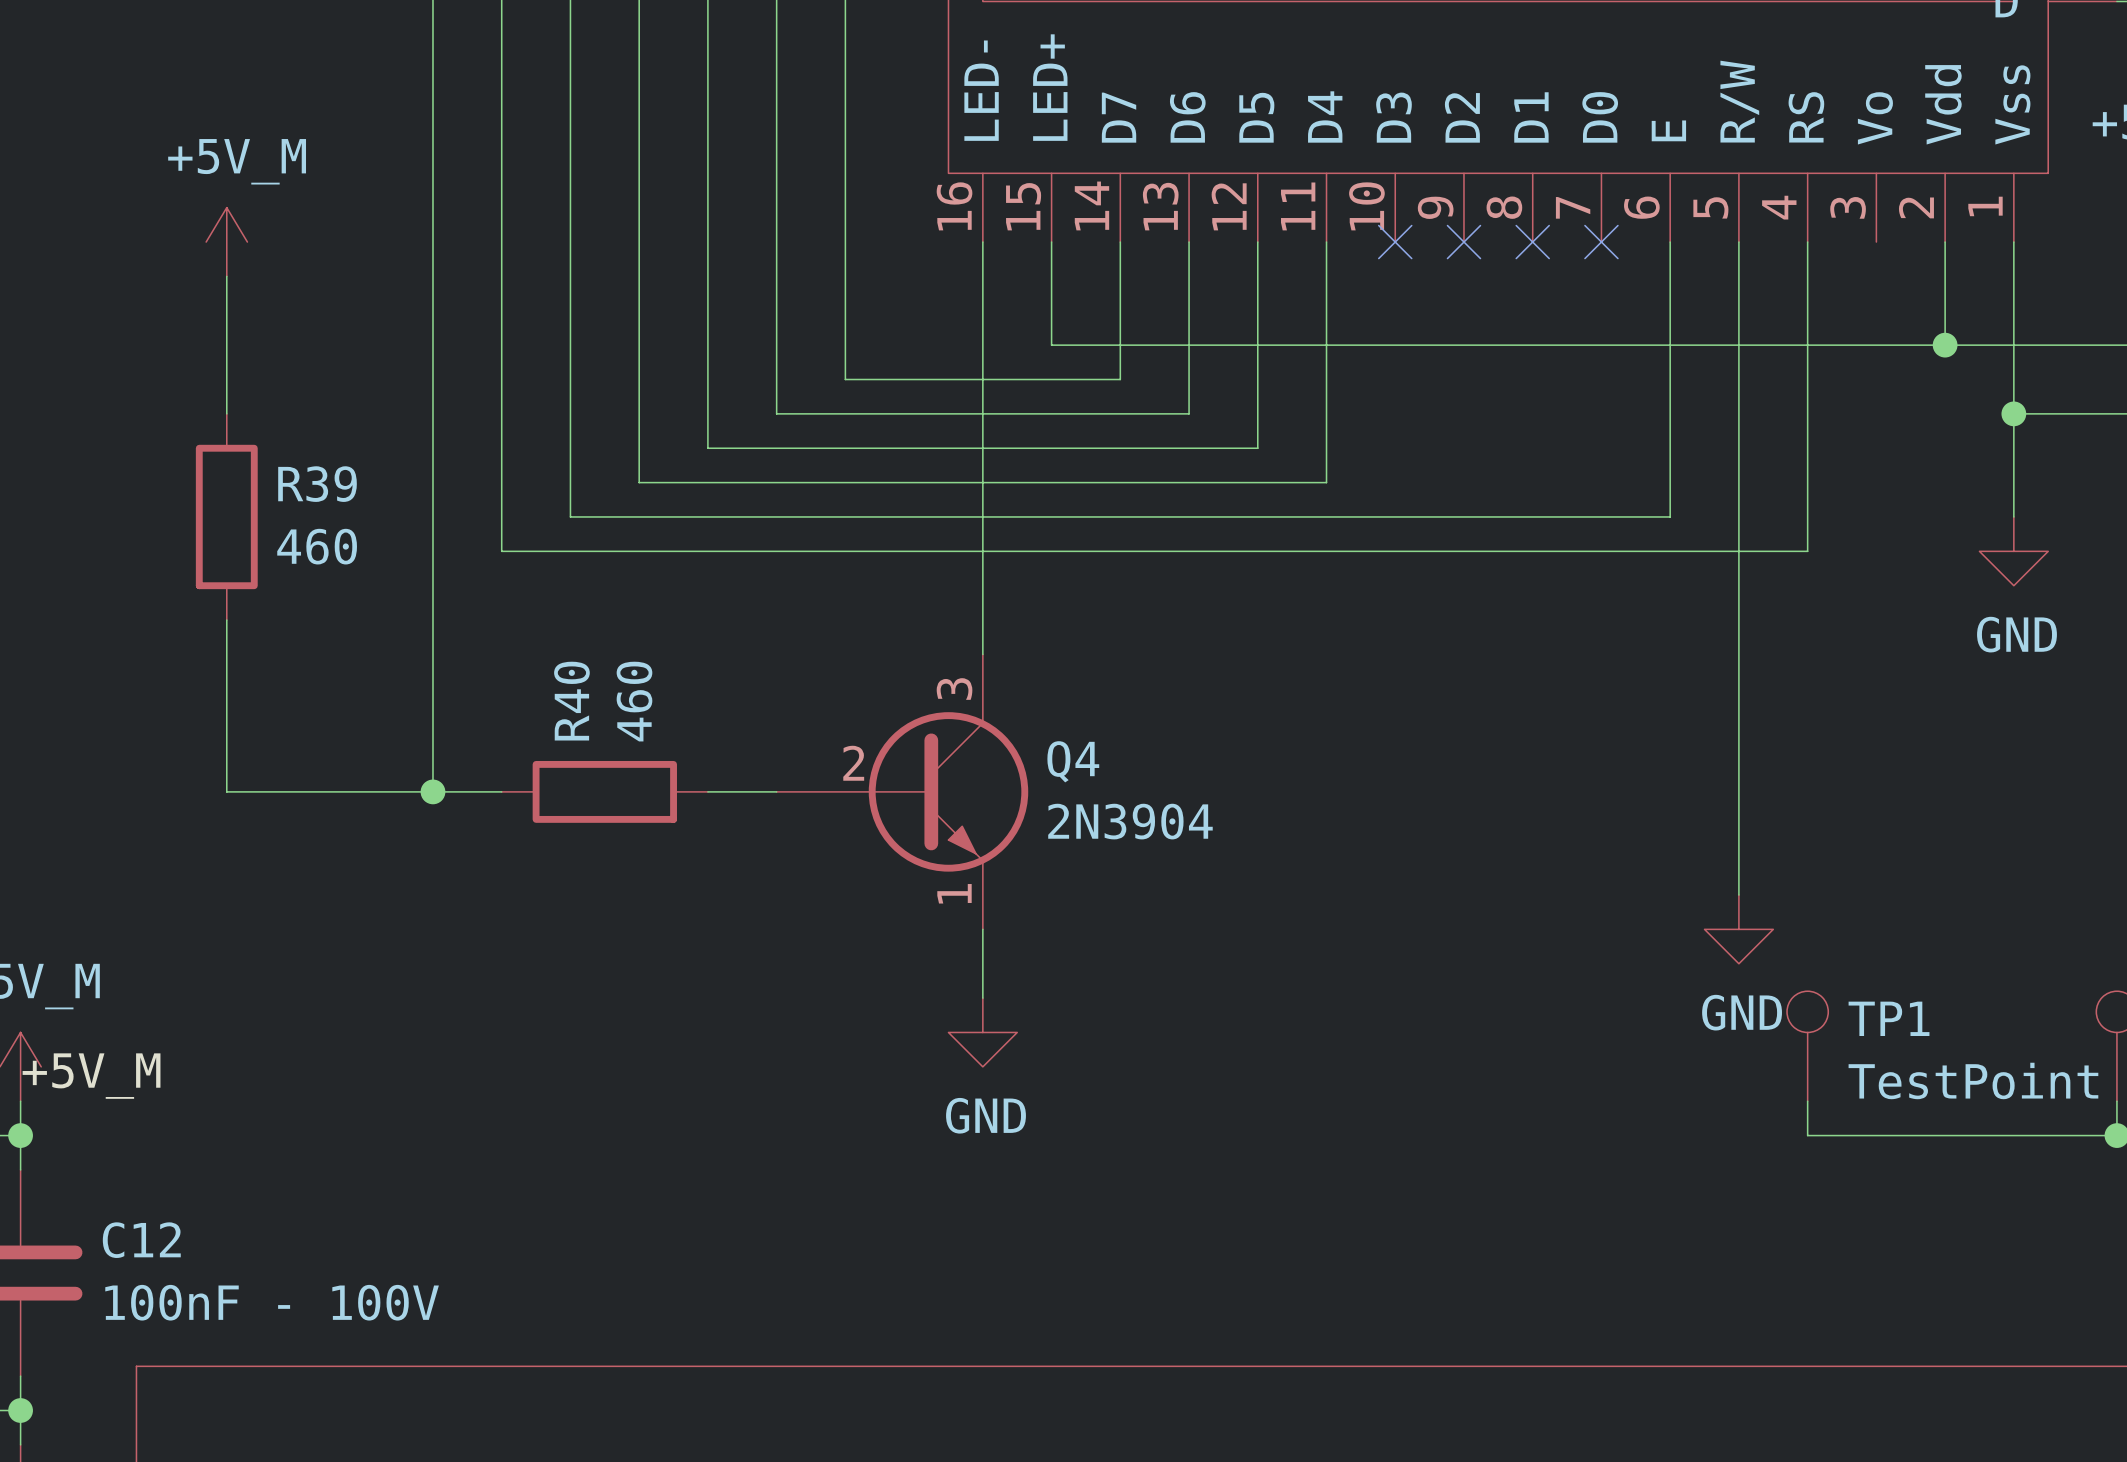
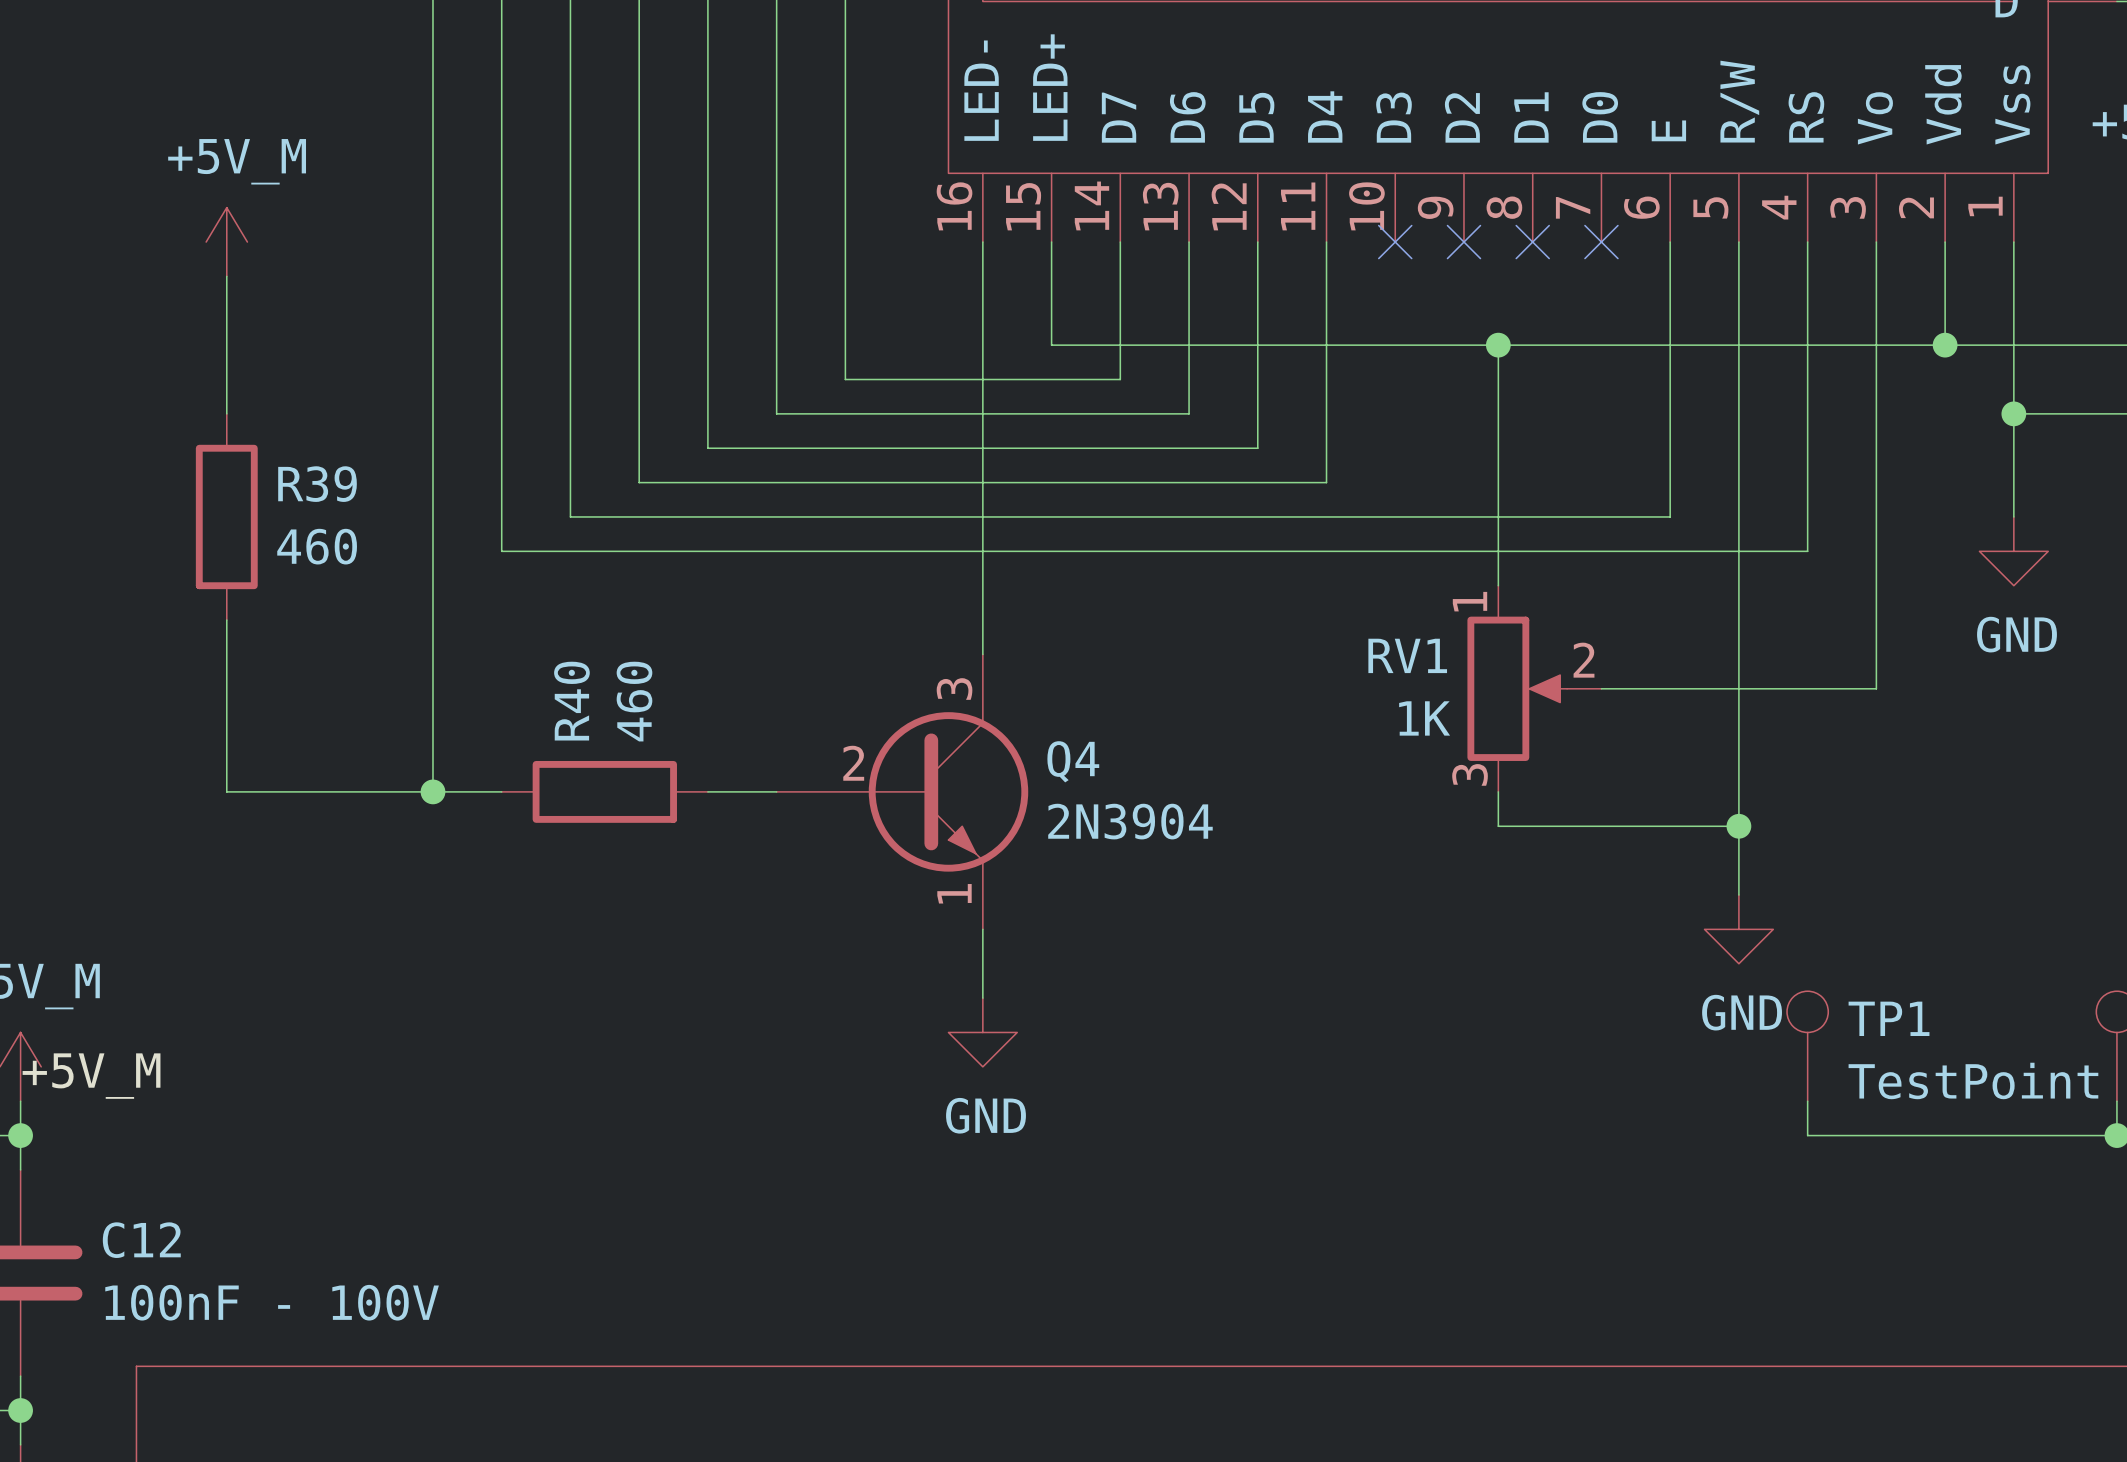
wire: none -> (1876, 242) (1876, 688) (1601, 688)
wire: none -> (1498, 345) (1498, 585)
junction: none -> (1498, 345)
RV1: none -> 1K (1534, 688)
wire: none -> (1498, 791) (1498, 826) (1738, 826)
junction: none -> (1738, 826)

